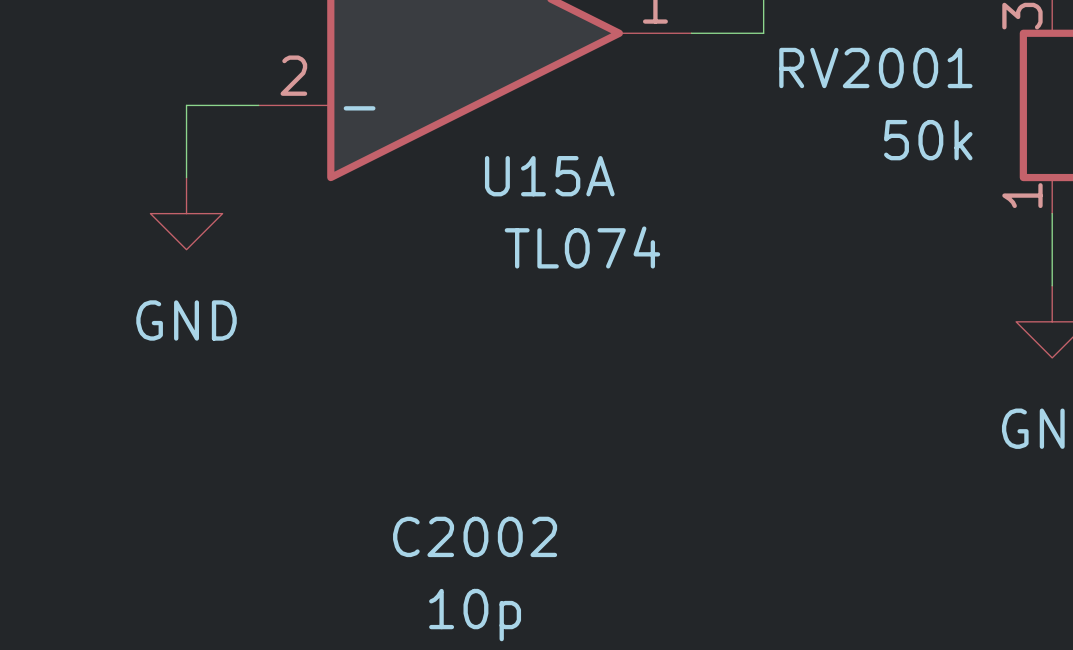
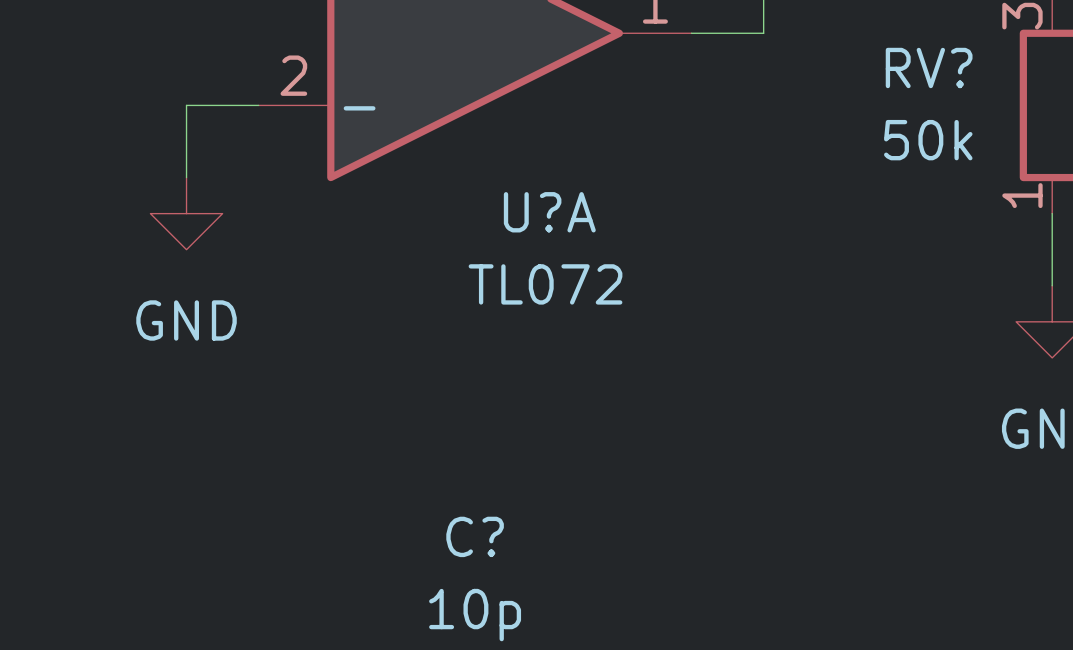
RV2001 name: RV2001 (875, 67) -> RV? (929, 67)
U15A name: U15A (549, 176) -> U?A (549, 212)
U15A value: TL074 (582, 247) -> TL072 (545, 284)
C2002 name: C2002 (475, 536) -> C? (475, 536)

